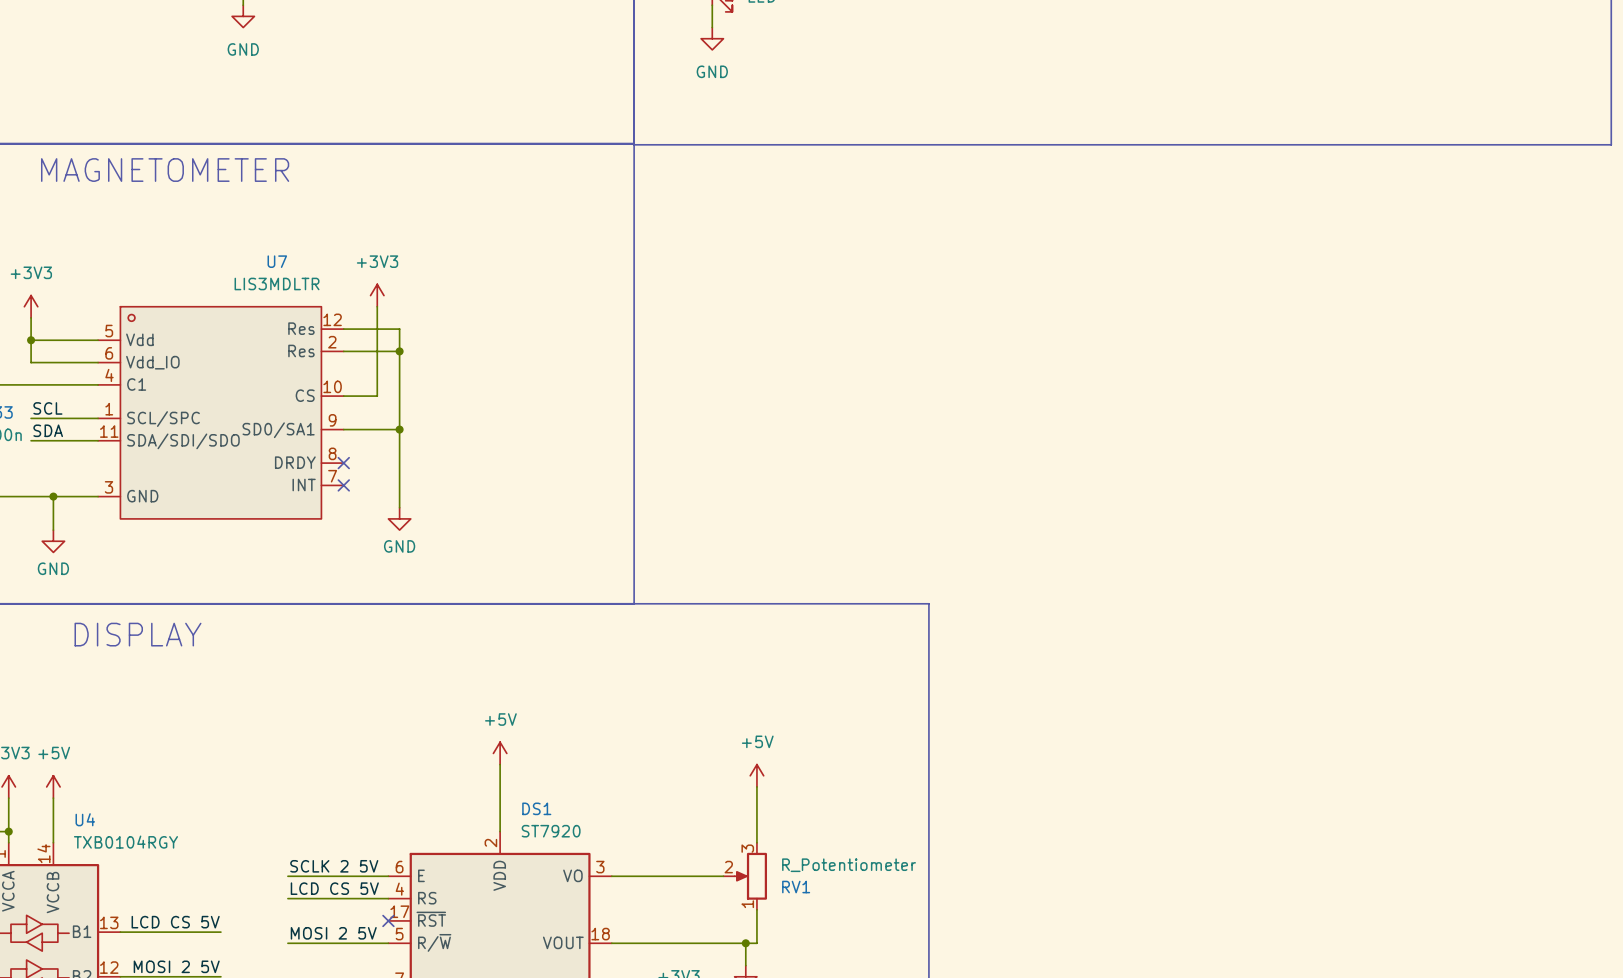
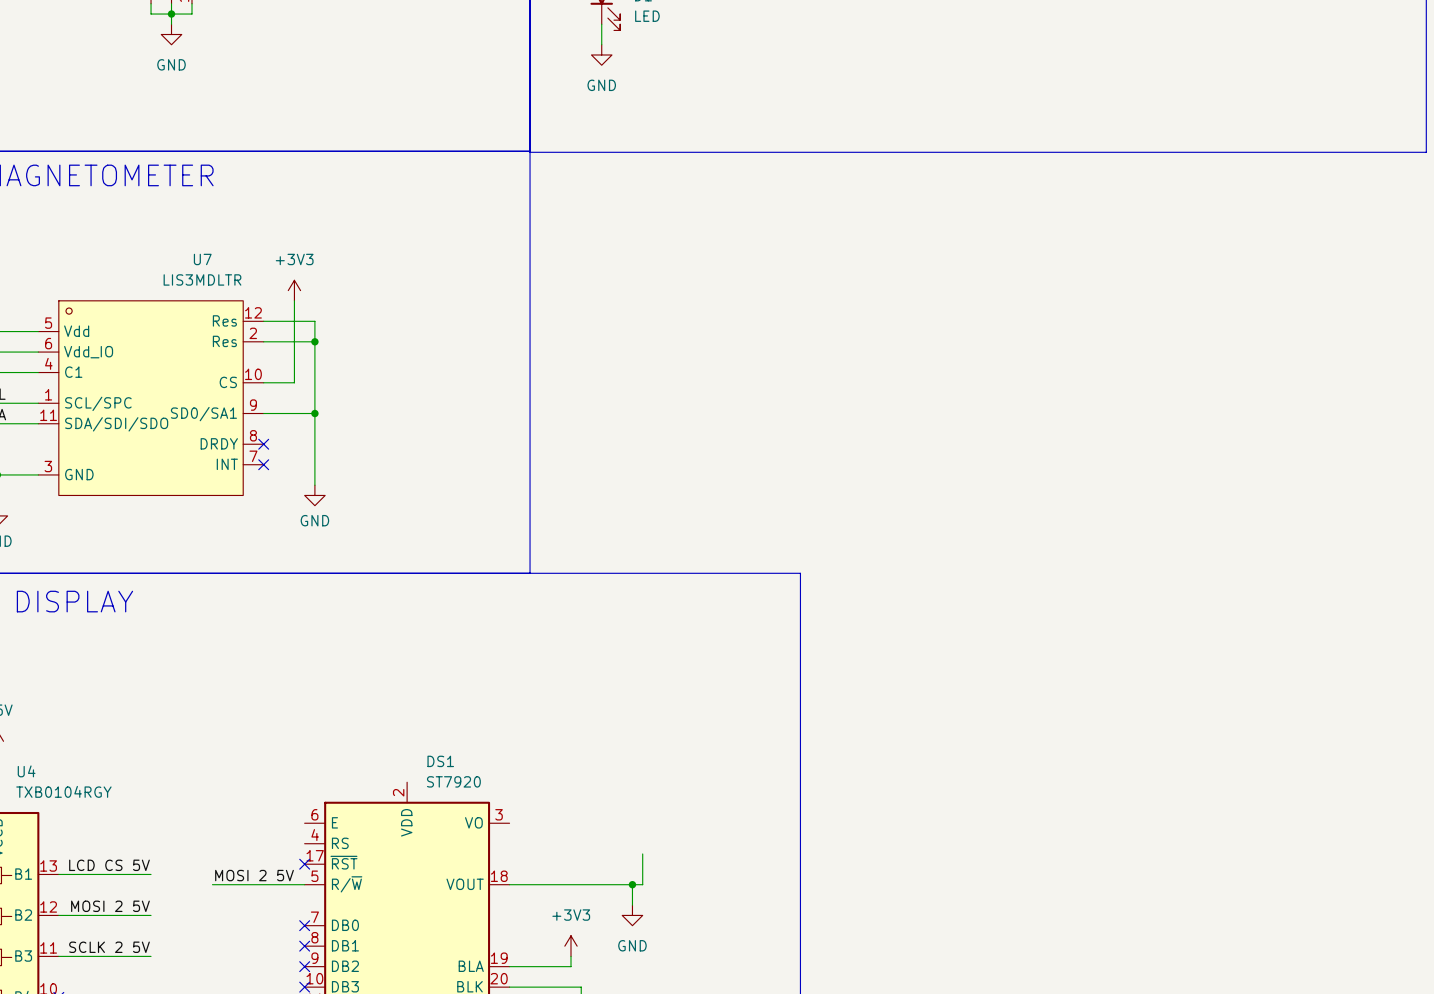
power symbol: +5V (500, 753) -> none
wire: (500, 764) (500, 831) -> none
power symbol: +5V (756, 775) -> none
wire: (756, 786) (756, 842) -> none
label: SCLK 2 5V (334, 866) -> none
wire: (287, 876) (388, 876) -> none
wire: (611, 876) (723, 876) -> none
RV1: R_Potentiometer (745, 876) -> none
label: LCD CS 5V (334, 888) -> none
wire: (287, 898) (388, 898) -> none

